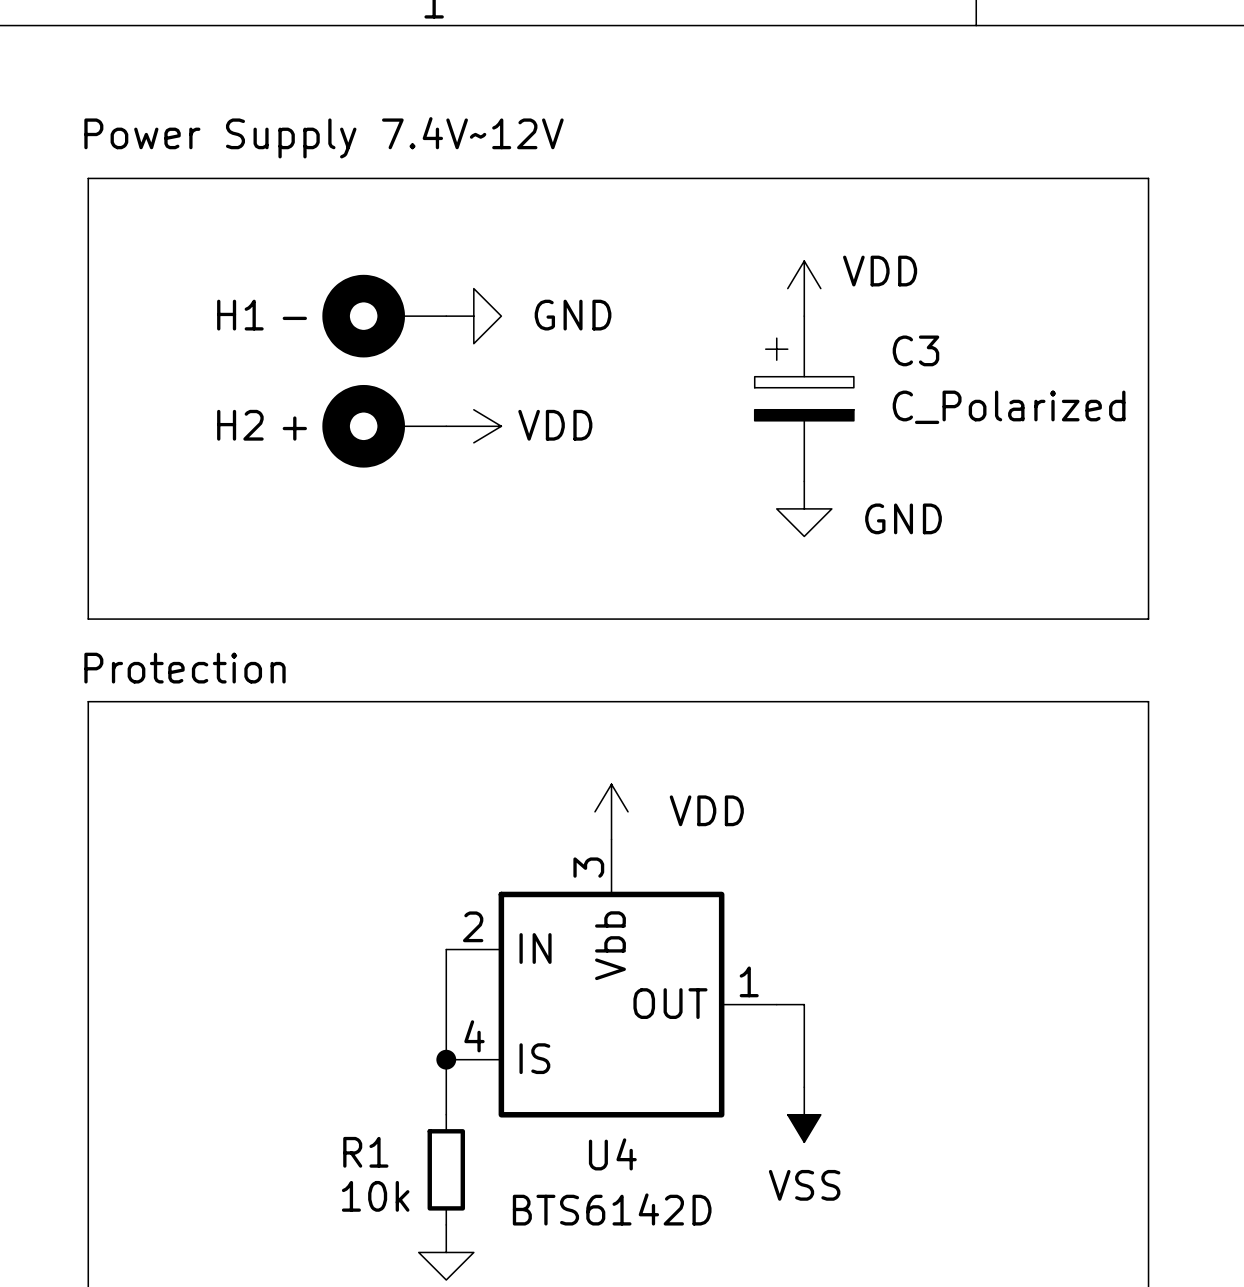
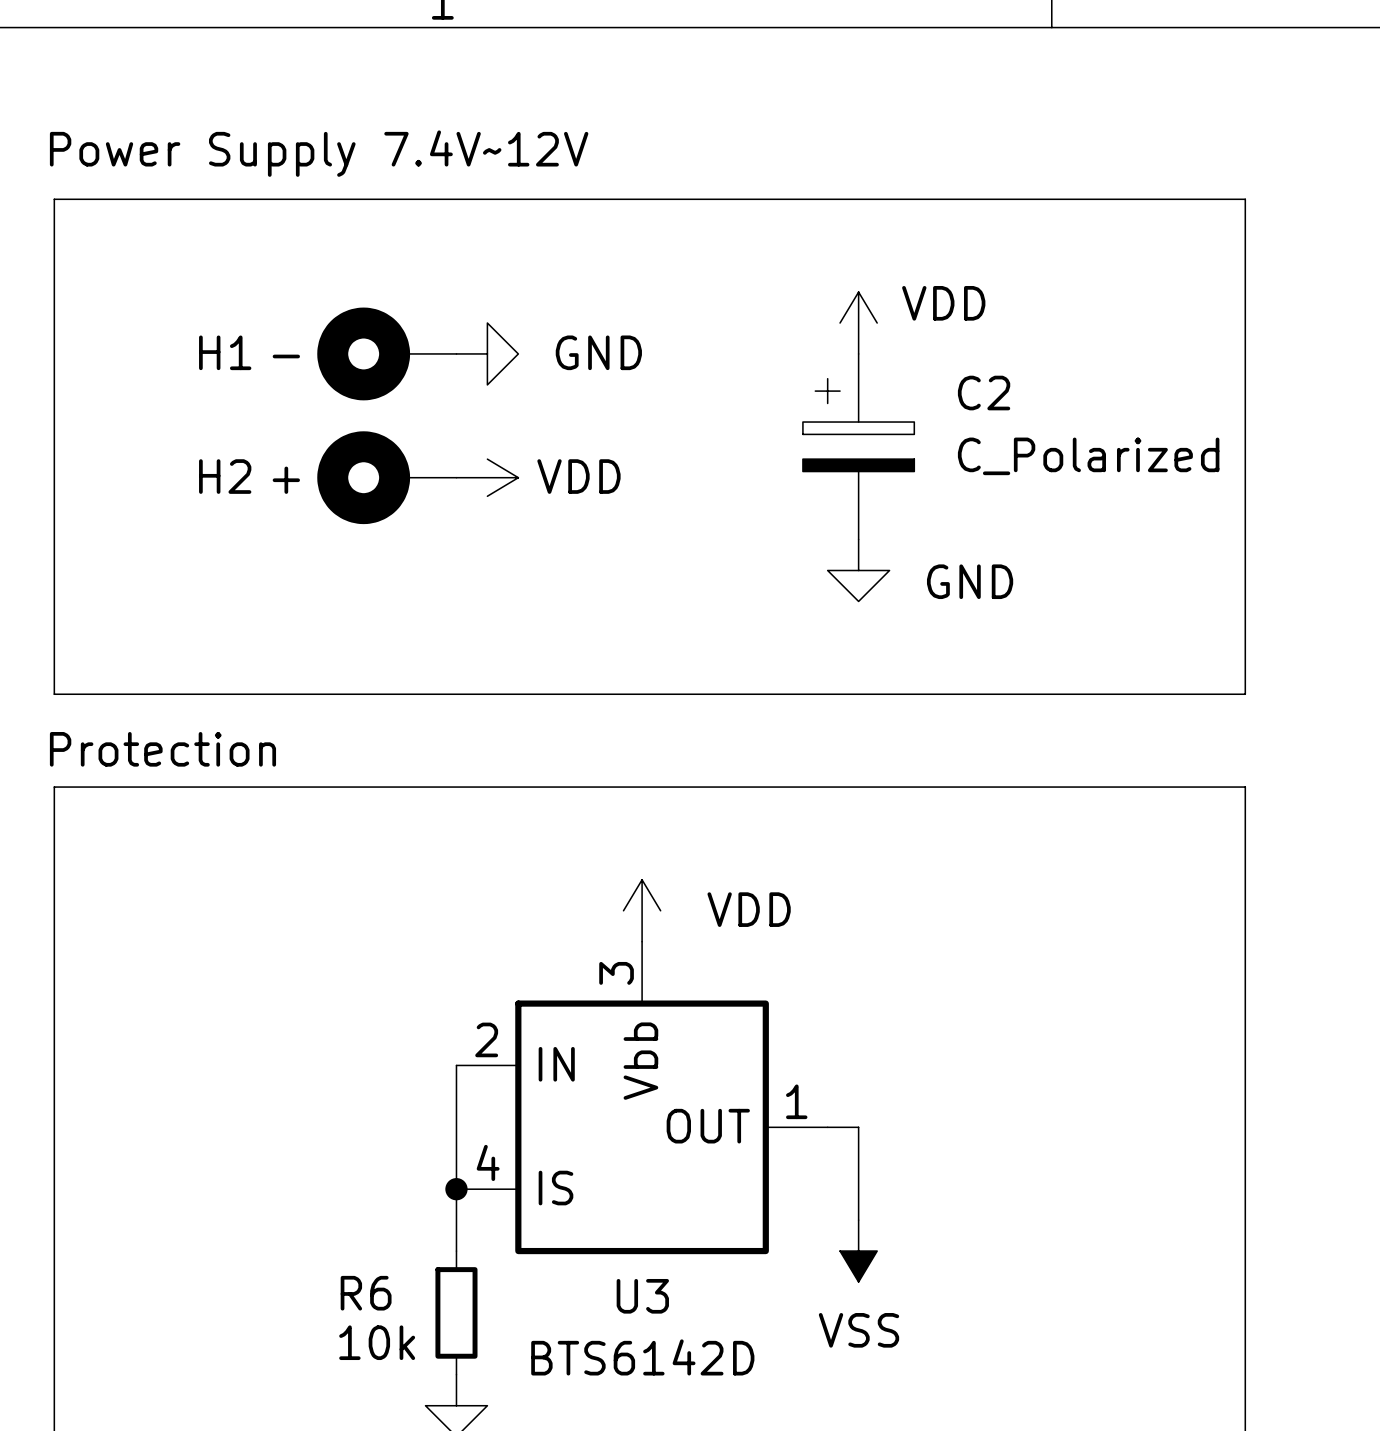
C3 name: C3 (915, 350) -> C2 (984, 393)
R1 name: R1 (365, 1152) -> R6 (366, 1293)
U4 name: U4 (612, 1154) -> U3 (642, 1296)

